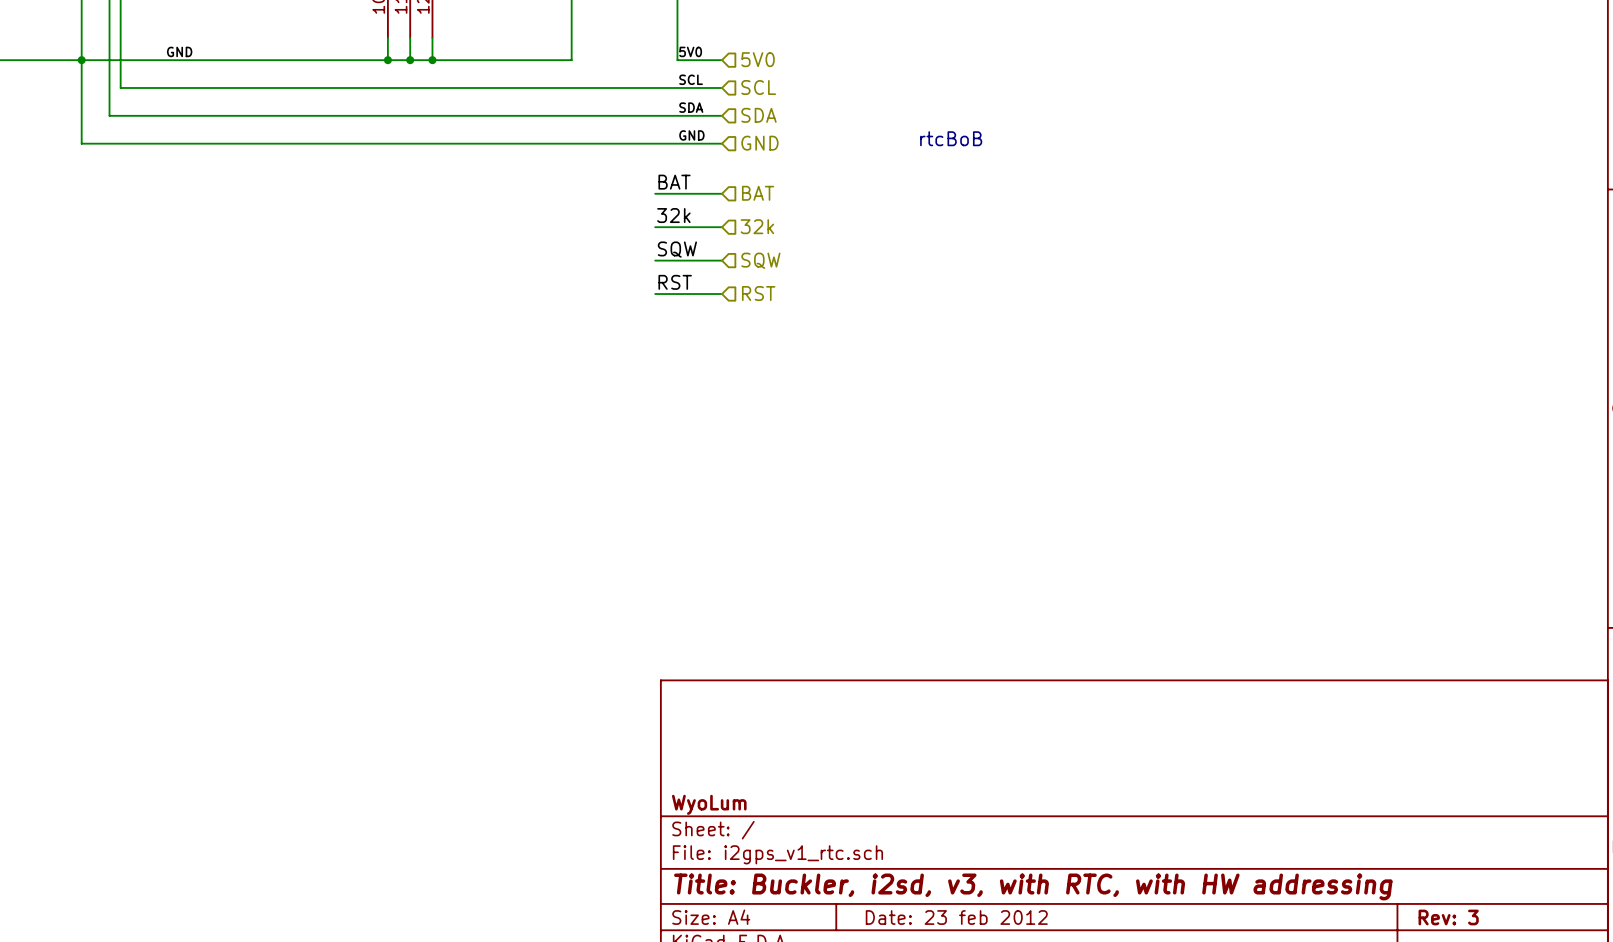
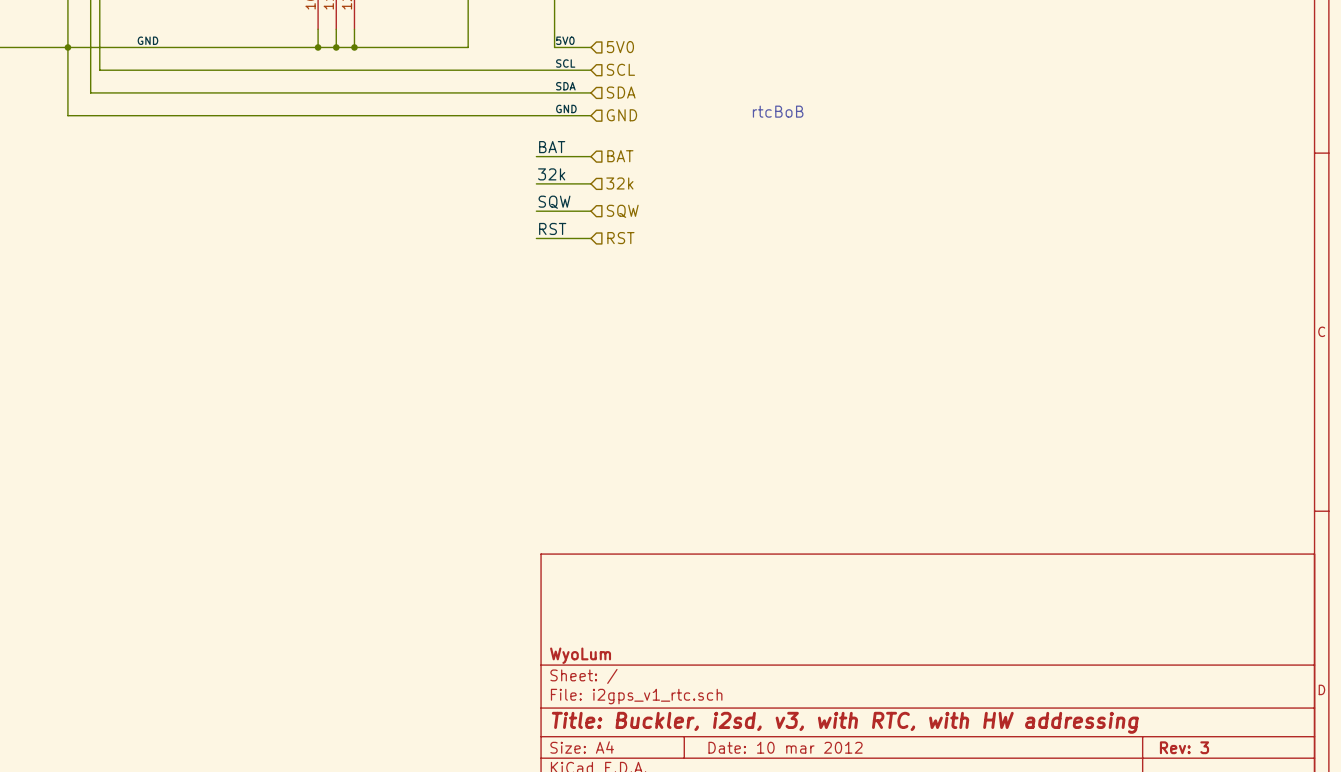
title block: Date: 23 feb 2012 (956, 917) -> Date: 10 mar 2012 (785, 747)

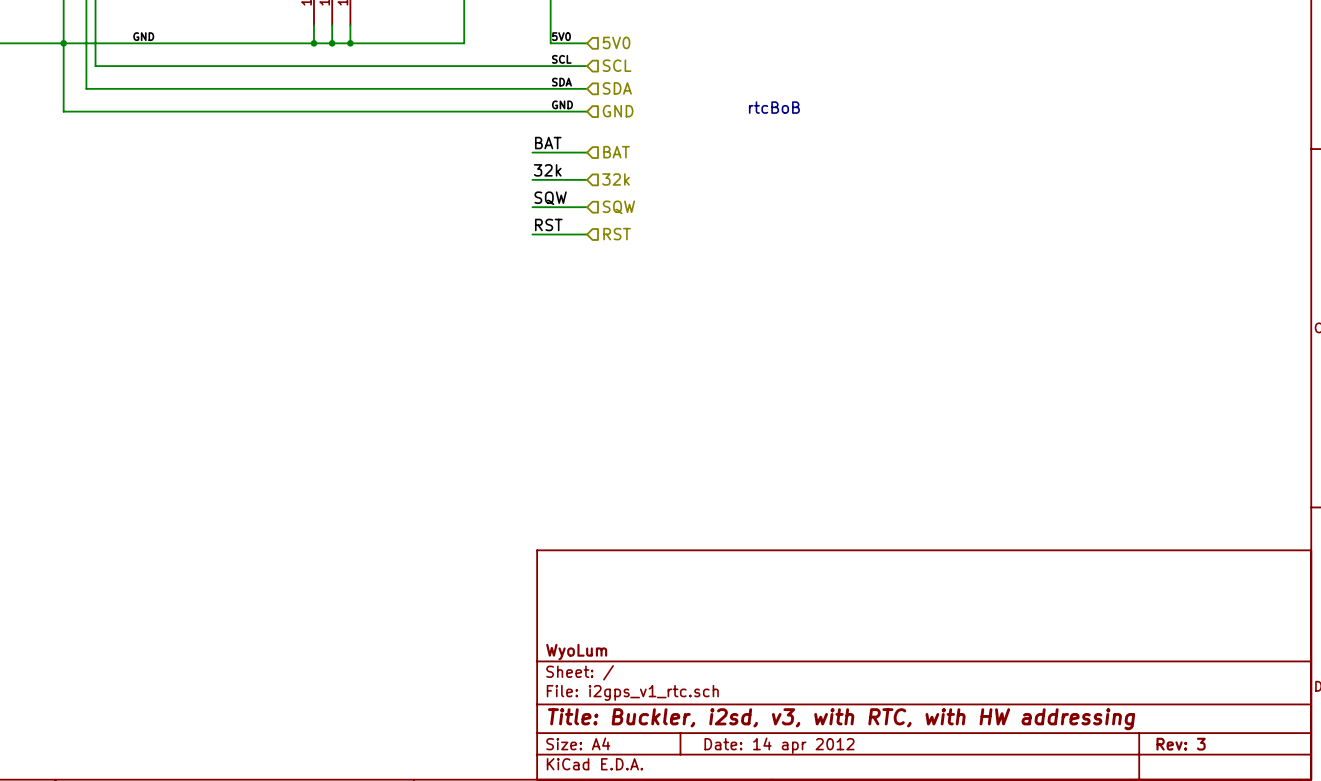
title block: Date: 10 mar 2012 (785, 747) -> Date: 14 apr 2012 (779, 745)

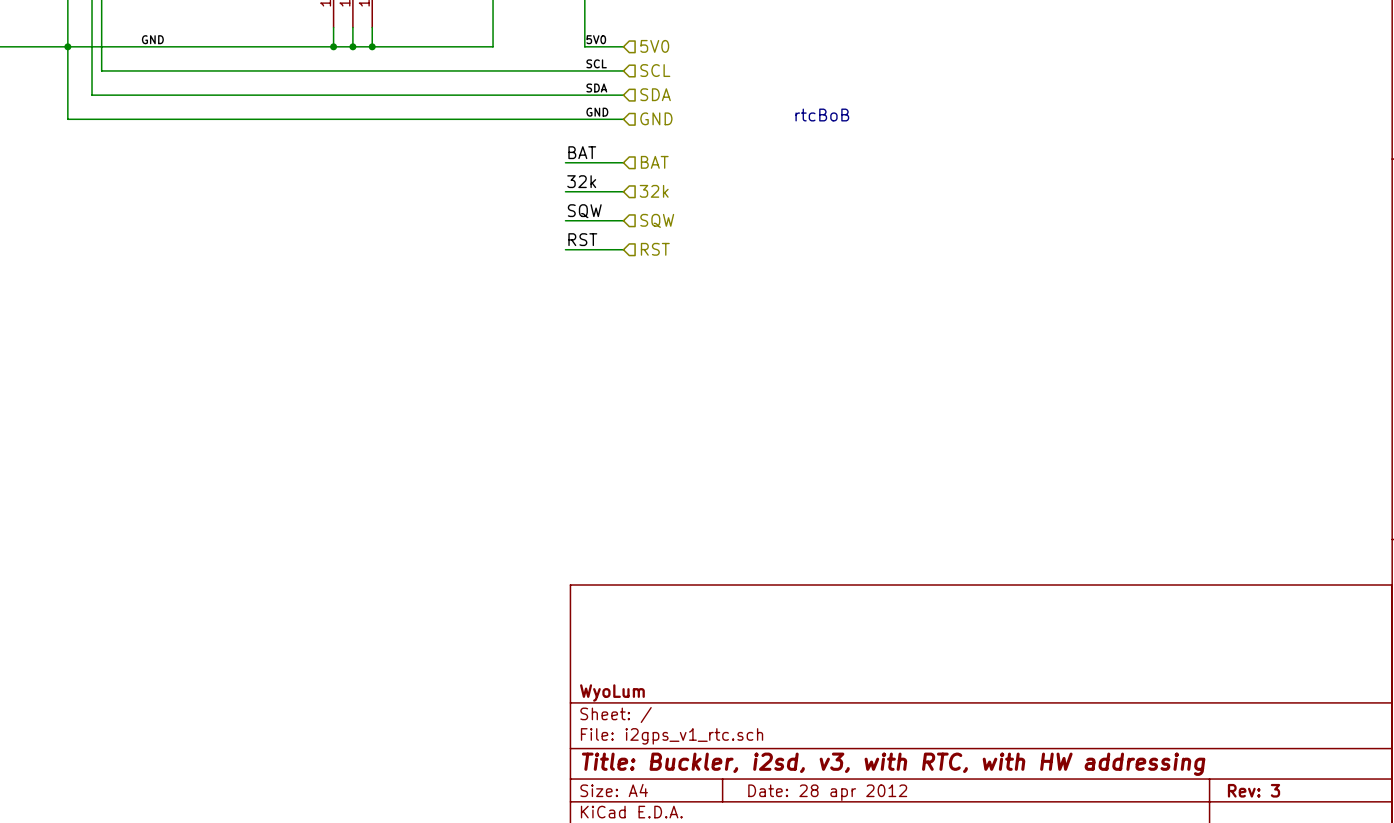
title block: Date: 14 apr 2012 (779, 745) -> Date: 28 apr 2012 (827, 792)

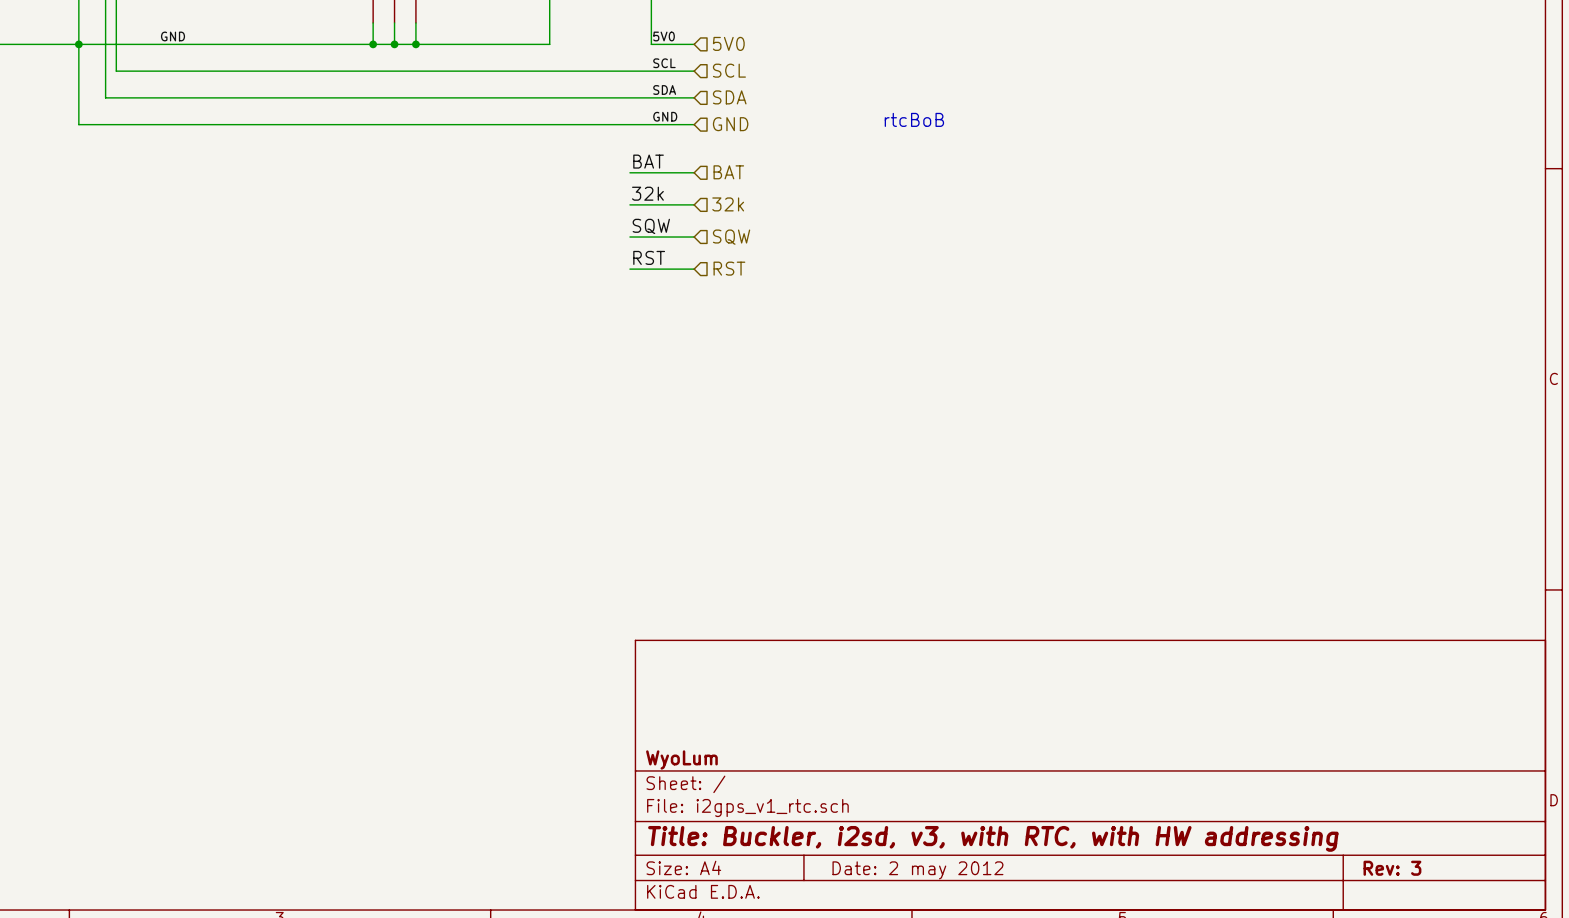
title block: Date: 28 apr 2012 (827, 792) -> Date: 2 may 2012 (917, 870)

